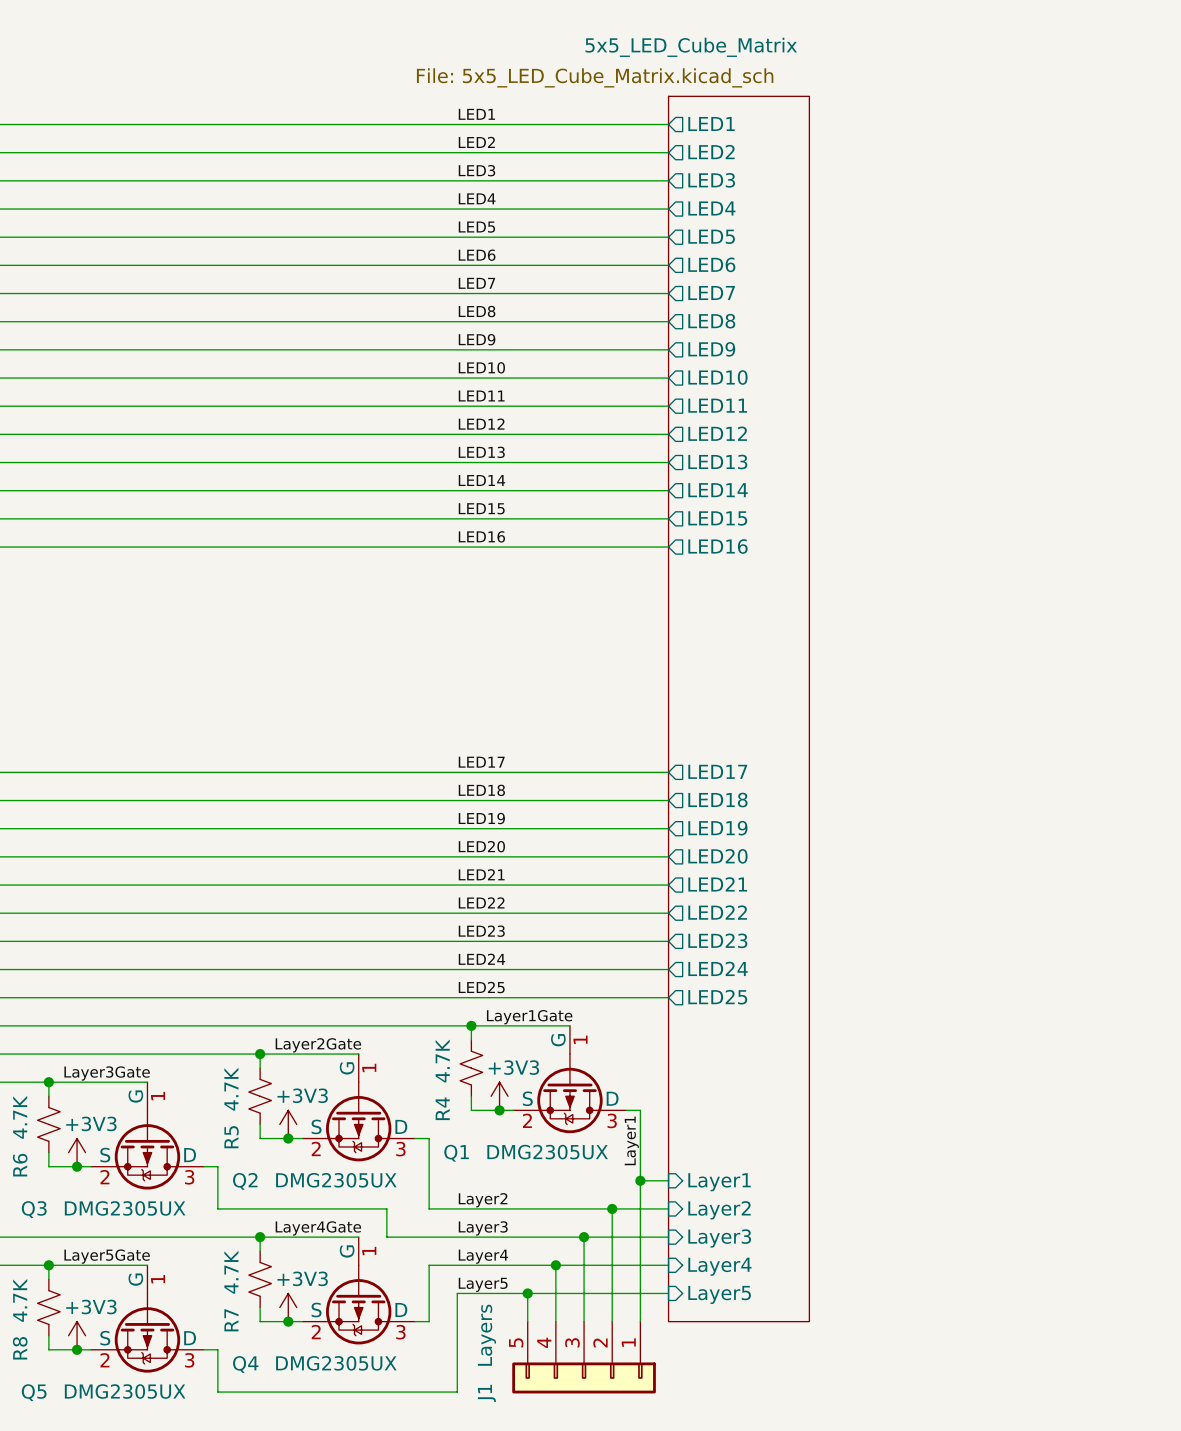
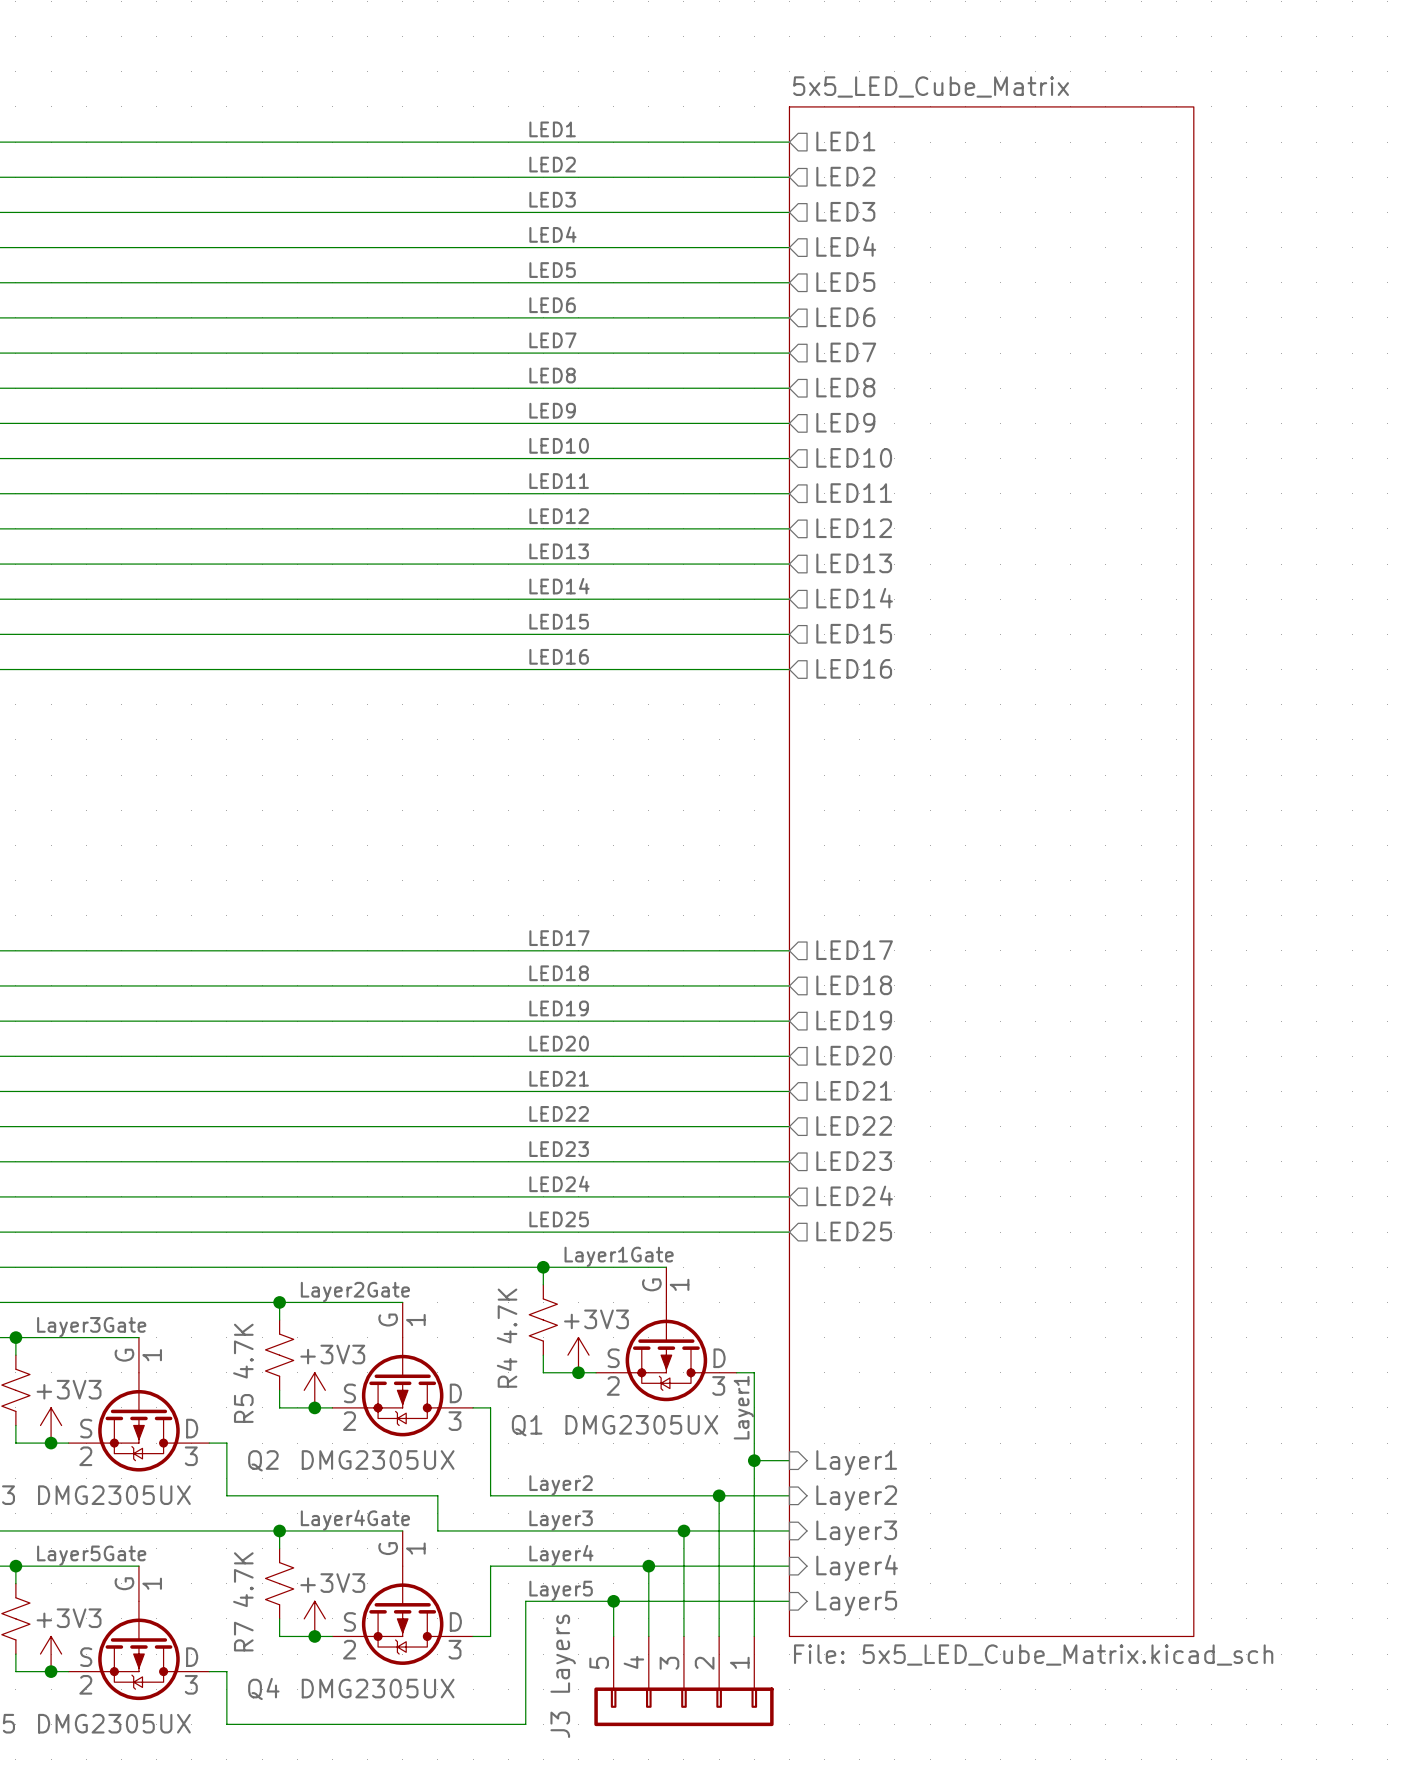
sheet 5x5_LED_Cube_Matrix name position: 5x5_LED_Cube_Matrix (691, 47) -> 5x5_LED_Cube_Matrix (931, 86)
sheet 5x5_LED_Cube_Matrix value position: File: 5x5_LED_Cube_Matrix.kicad_sch (595, 77) -> File: 5x5_LED_Cube_Matrix.kicad_sch (1033, 1655)
sheet 5x5_LED_Cube_Matrix shape: [668, 96, 810, 1322] -> [789, 106, 1194, 1637]
J1 name: J1 (486, 1393) -> J3 (560, 1724)

